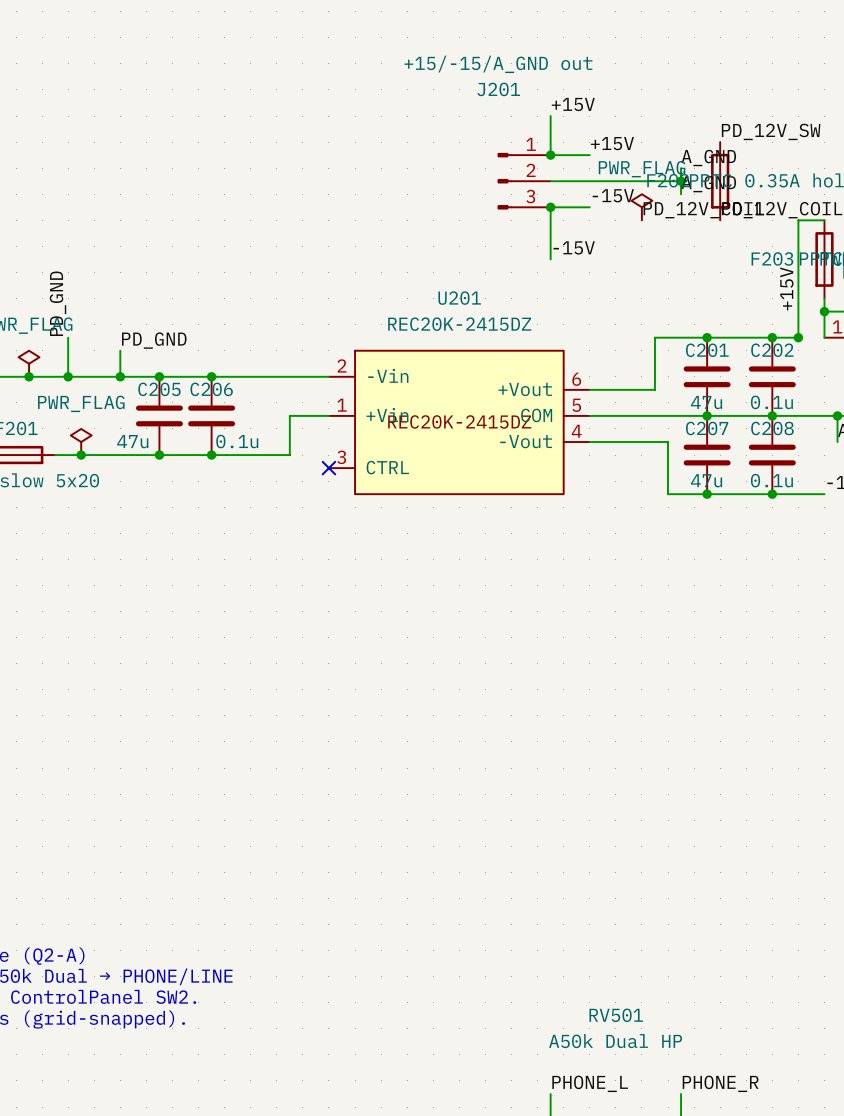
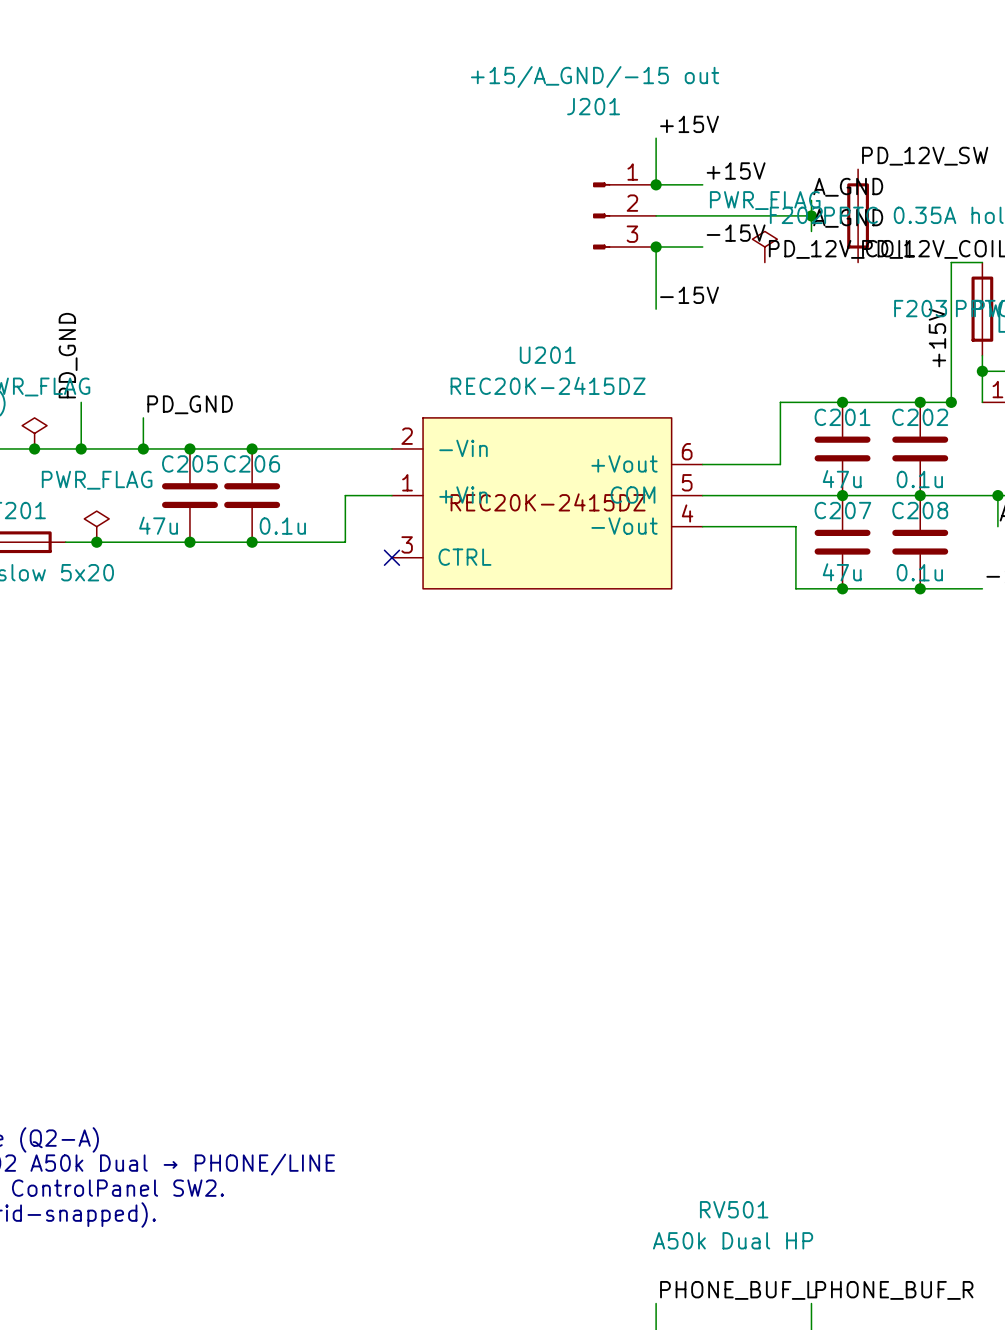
J201 value: +15/-15/A_GND out (498, 64) -> +15/A_GND/-15 out (595, 76)
label: PHONE_L (590, 1083) -> PHONE_BUF_L (738, 1290)
label: PHONE_R (720, 1083) -> PHONE_BUF_R (894, 1290)

